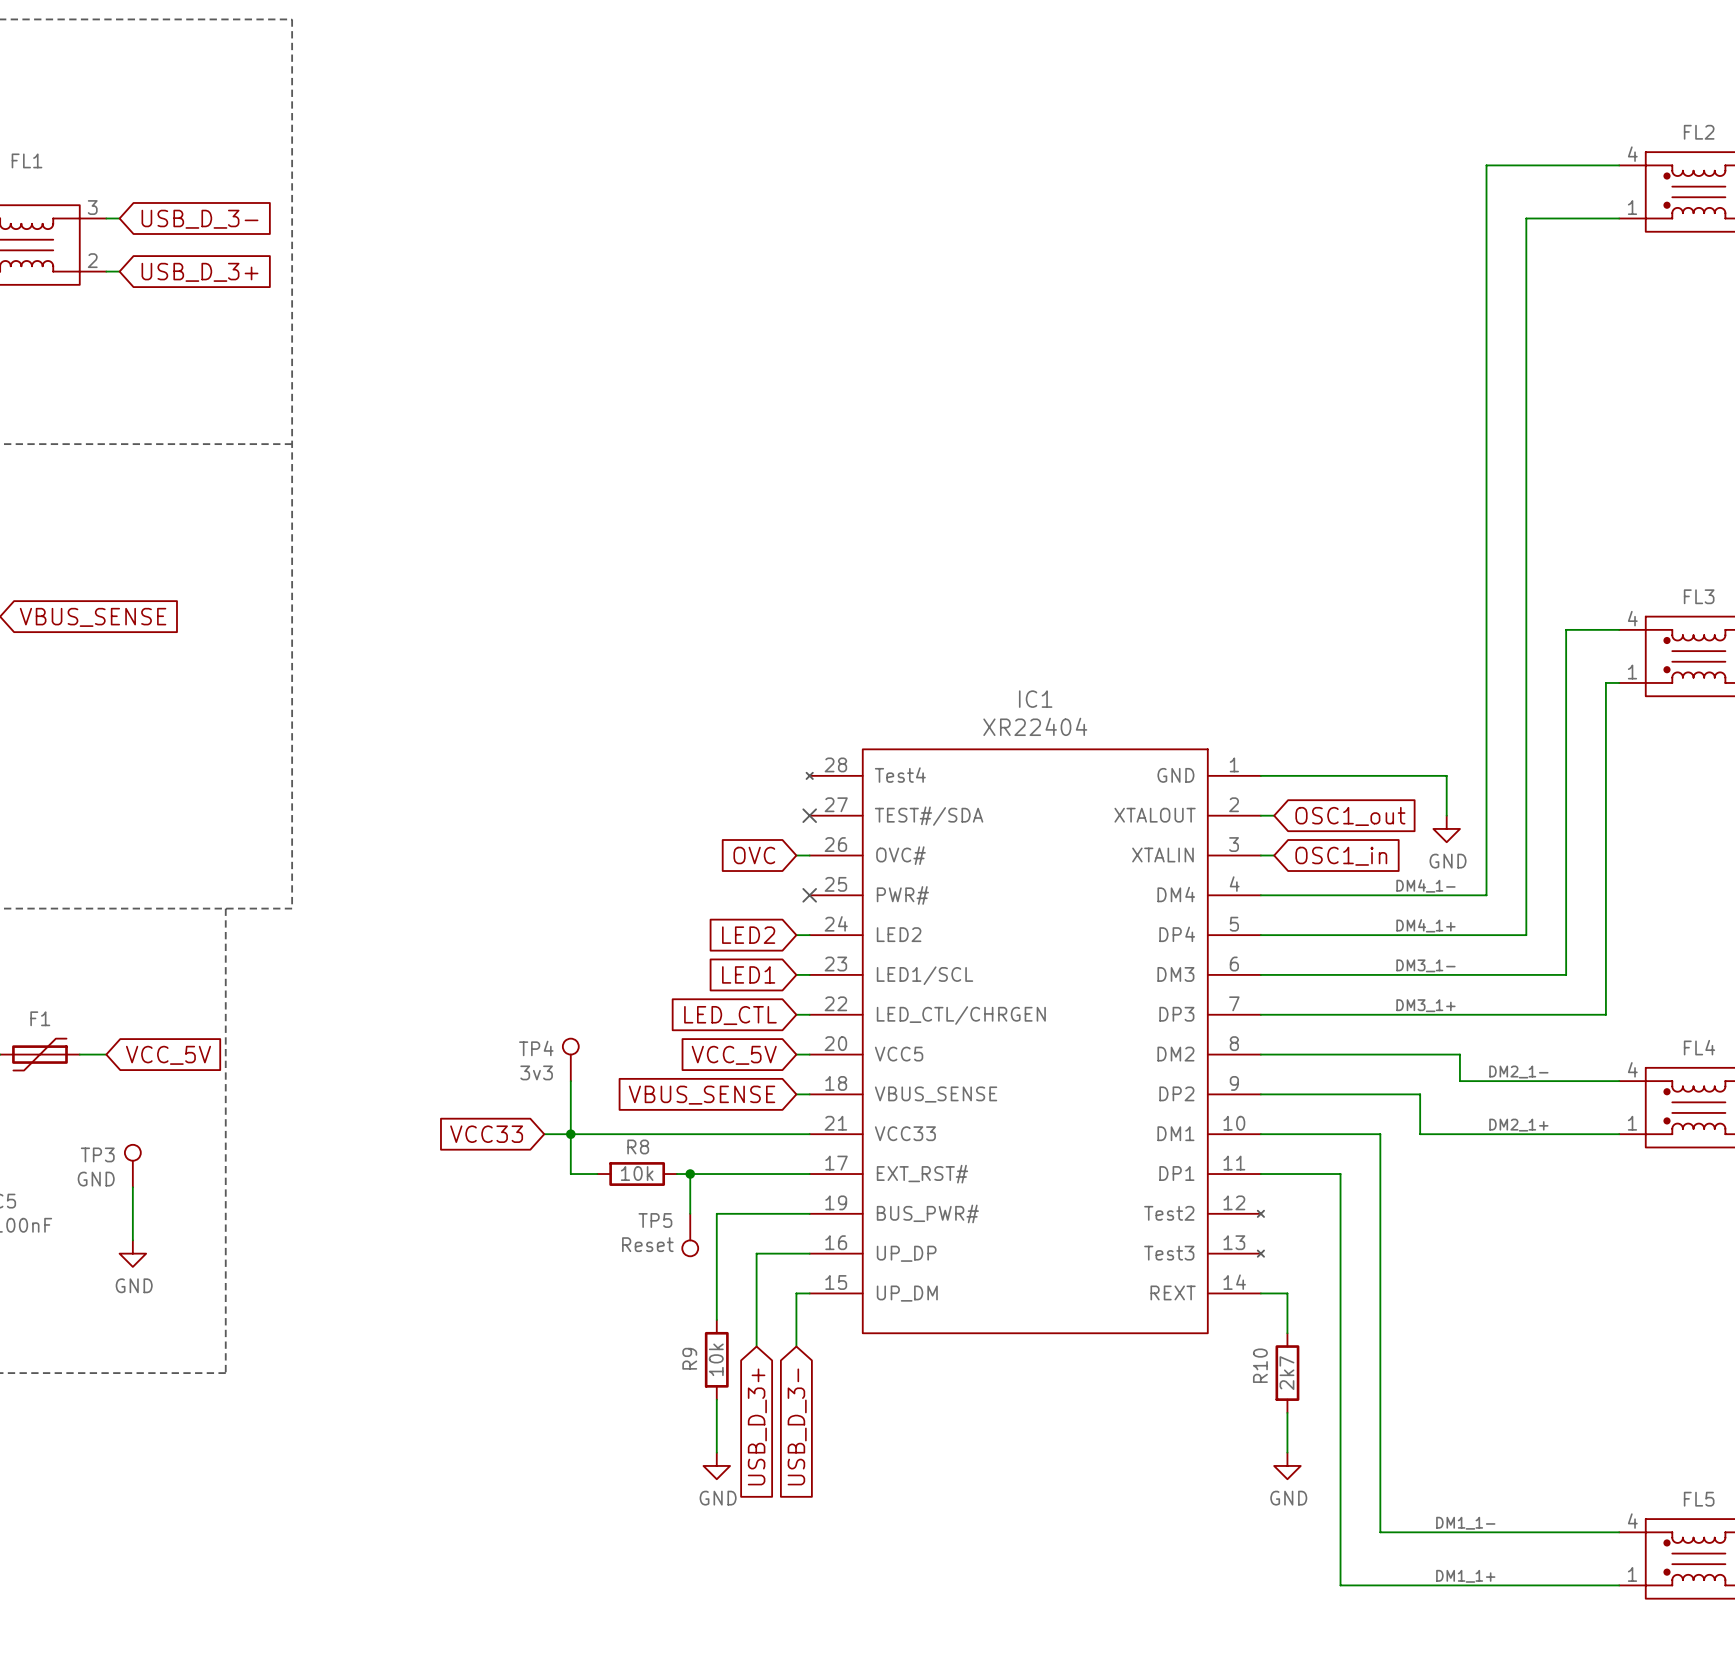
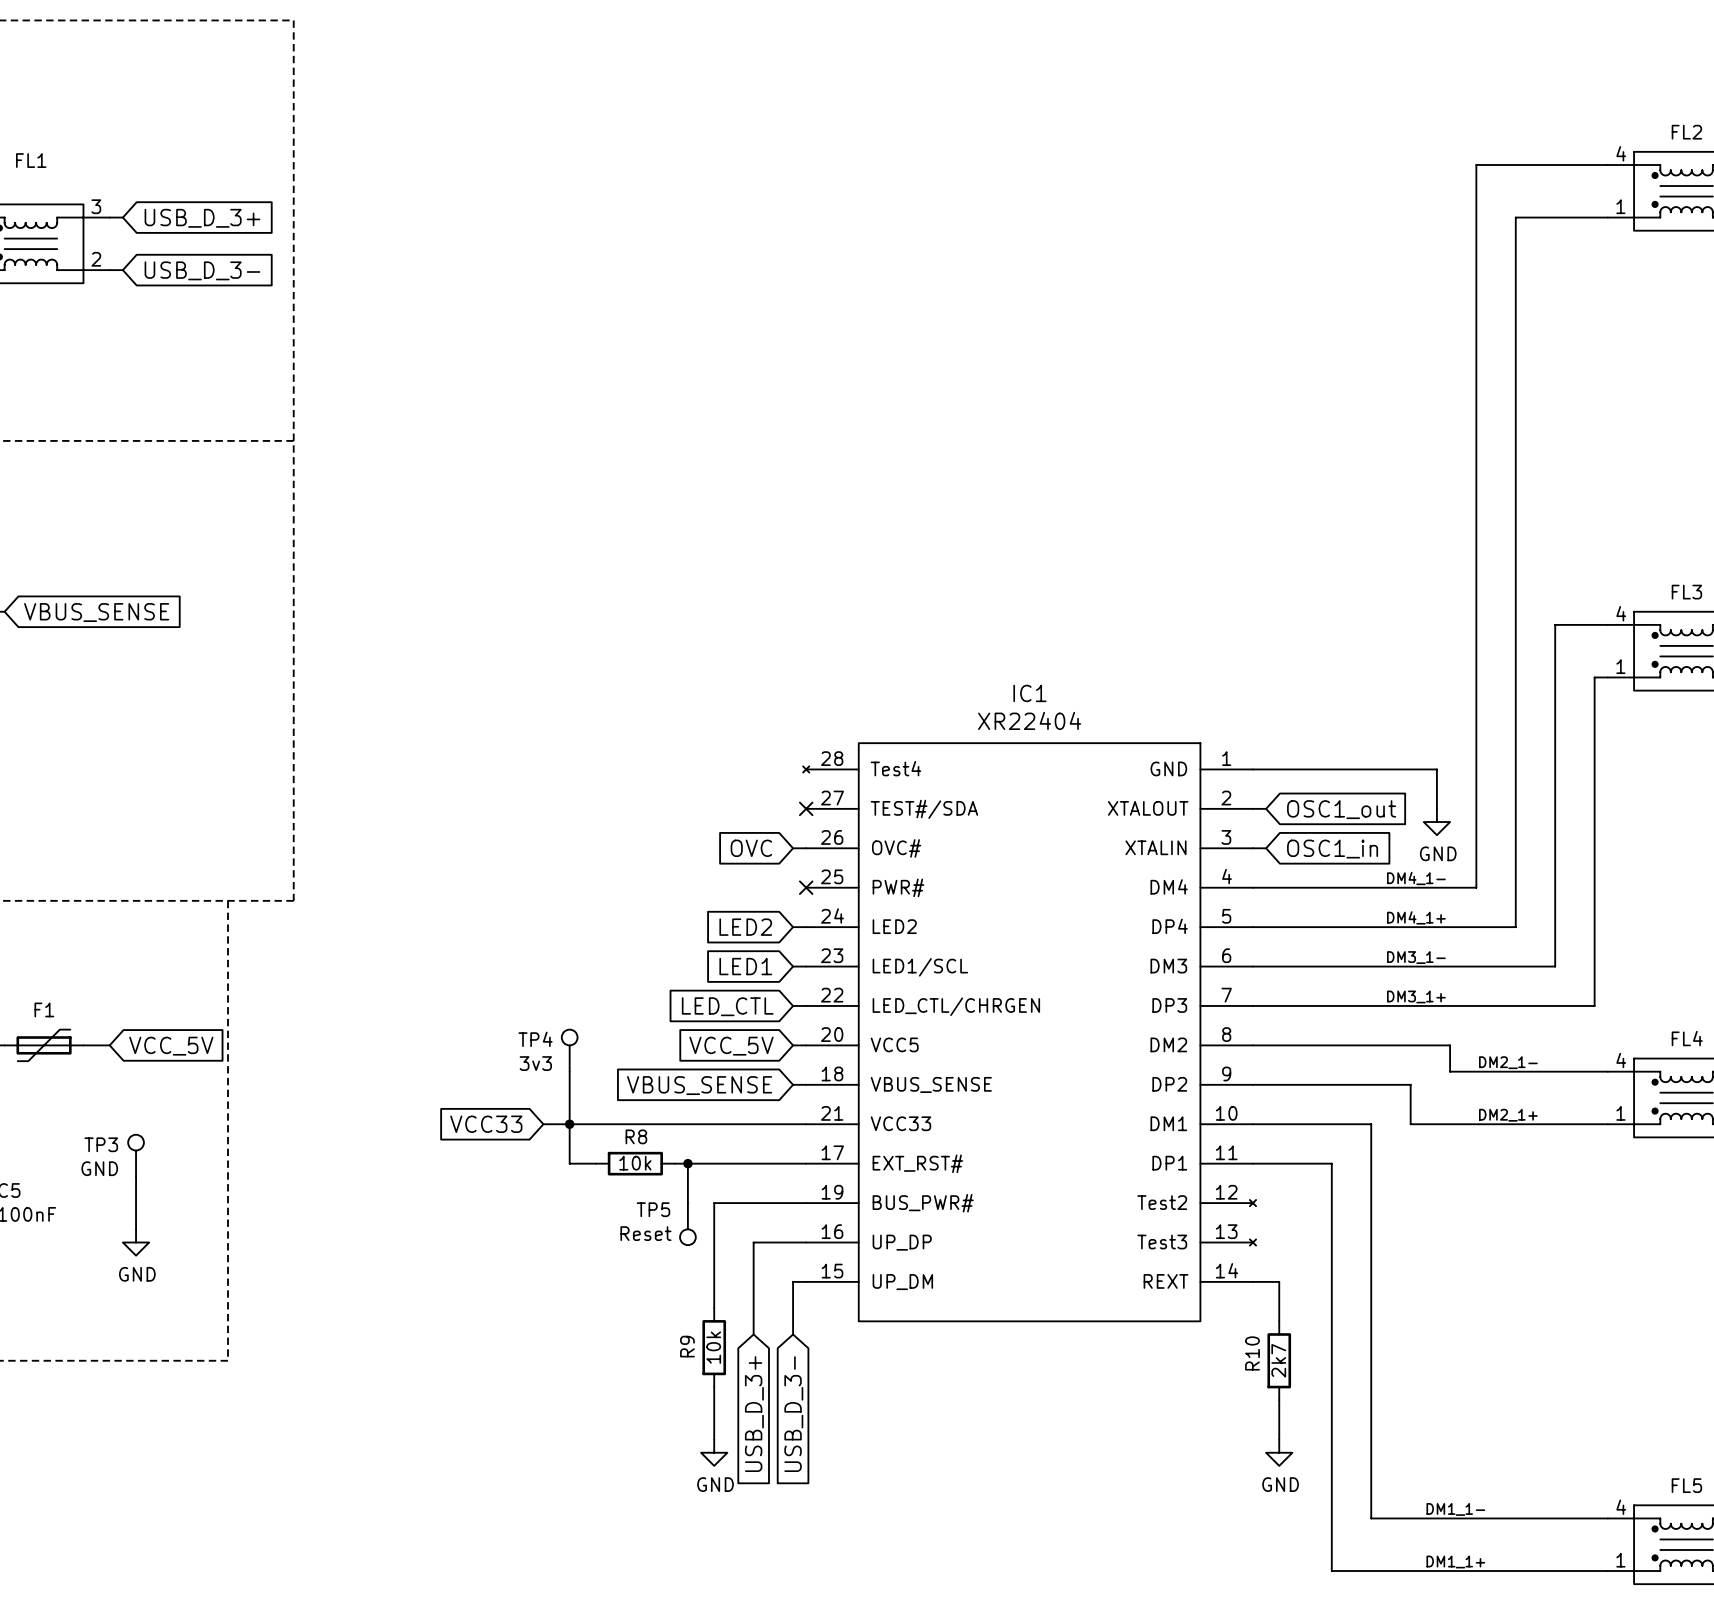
global label: USB_D_3- (199, 219) -> USB_D_3+ (202, 218)
global label: USB_D_3+ (199, 272) -> USB_D_3- (202, 270)

